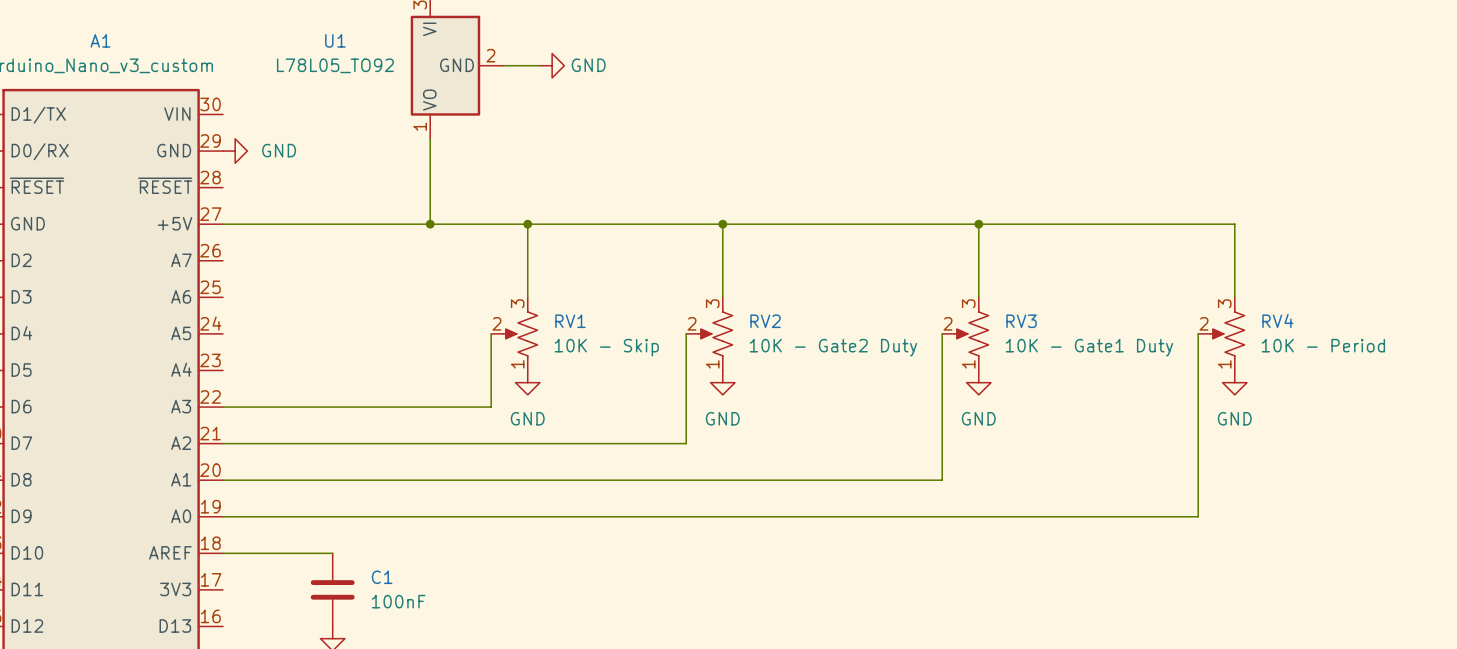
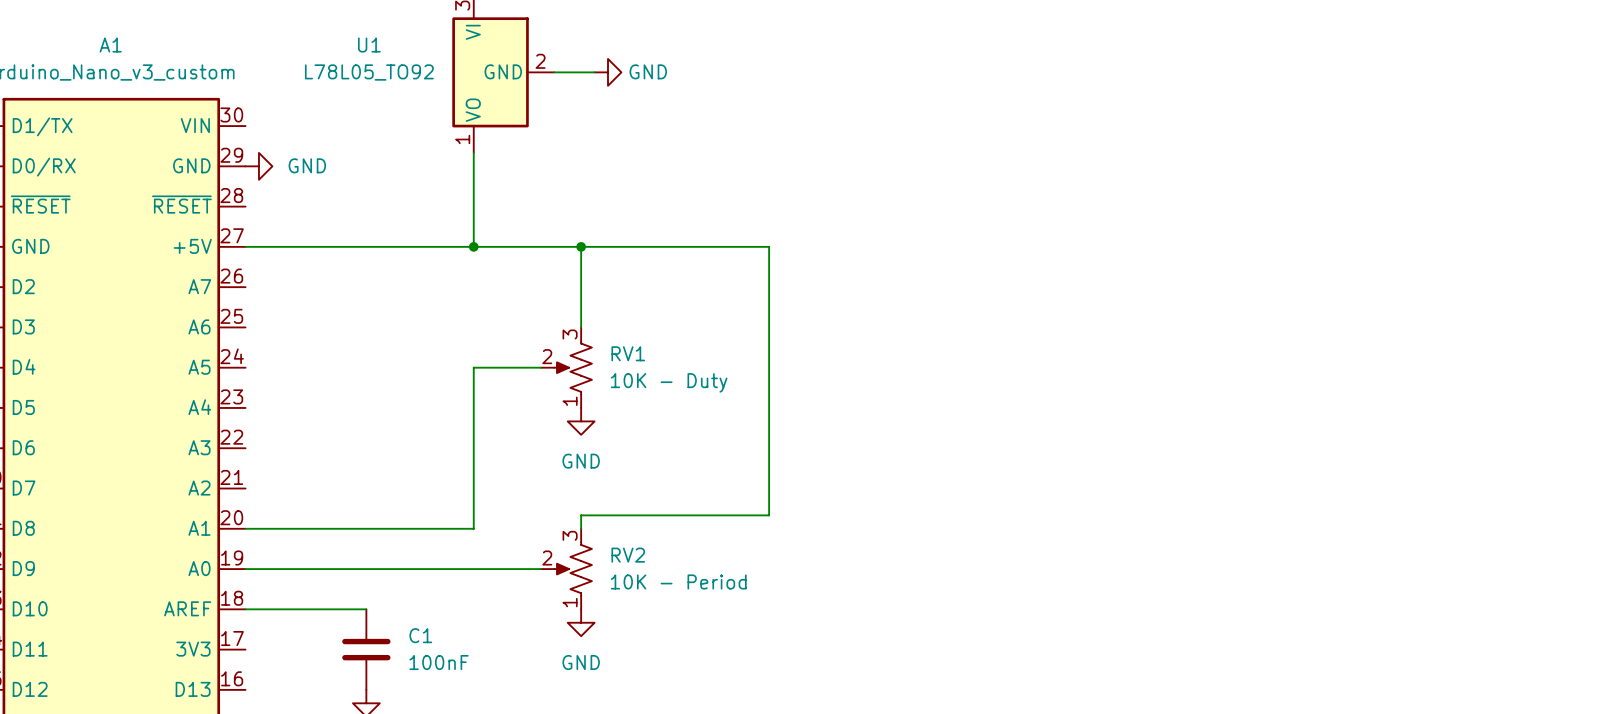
wire: (698, 224) (1234, 224) (1234, 297) -> (769, 246) (769, 515) (581, 515) (581, 528)
wire: (722, 224) (722, 297) -> none
junction: (722, 224) -> none
wire: (978, 224) (978, 297) -> none
junction: (978, 224) -> none
wire: (491, 333) (491, 407) (222, 407) -> (540, 367) (473, 367) (473, 528)
wire: (686, 333) (686, 443) (222, 443) -> none
RV2 position: (709, 333) -> (566, 569)
wire: (942, 333) (942, 480) (430, 480) -> none
RV3: 10K - Gate1 Duty (965, 333) -> none
wire: (1198, 333) (1198, 516) (491, 516) -> none
RV4: 10K - Period (1221, 333) -> none
RV1 value: 10K - Skip (606, 347) -> 10K - Duty (669, 382)
RV2 value: 10K - Gate2 Duty (833, 347) -> 10K - Period (678, 581)
power symbol: GND (722, 382) -> none
power symbol: GND (978, 382) -> none
power symbol: GND (1234, 382) -> none
power symbol: none -> GND (581, 622)

